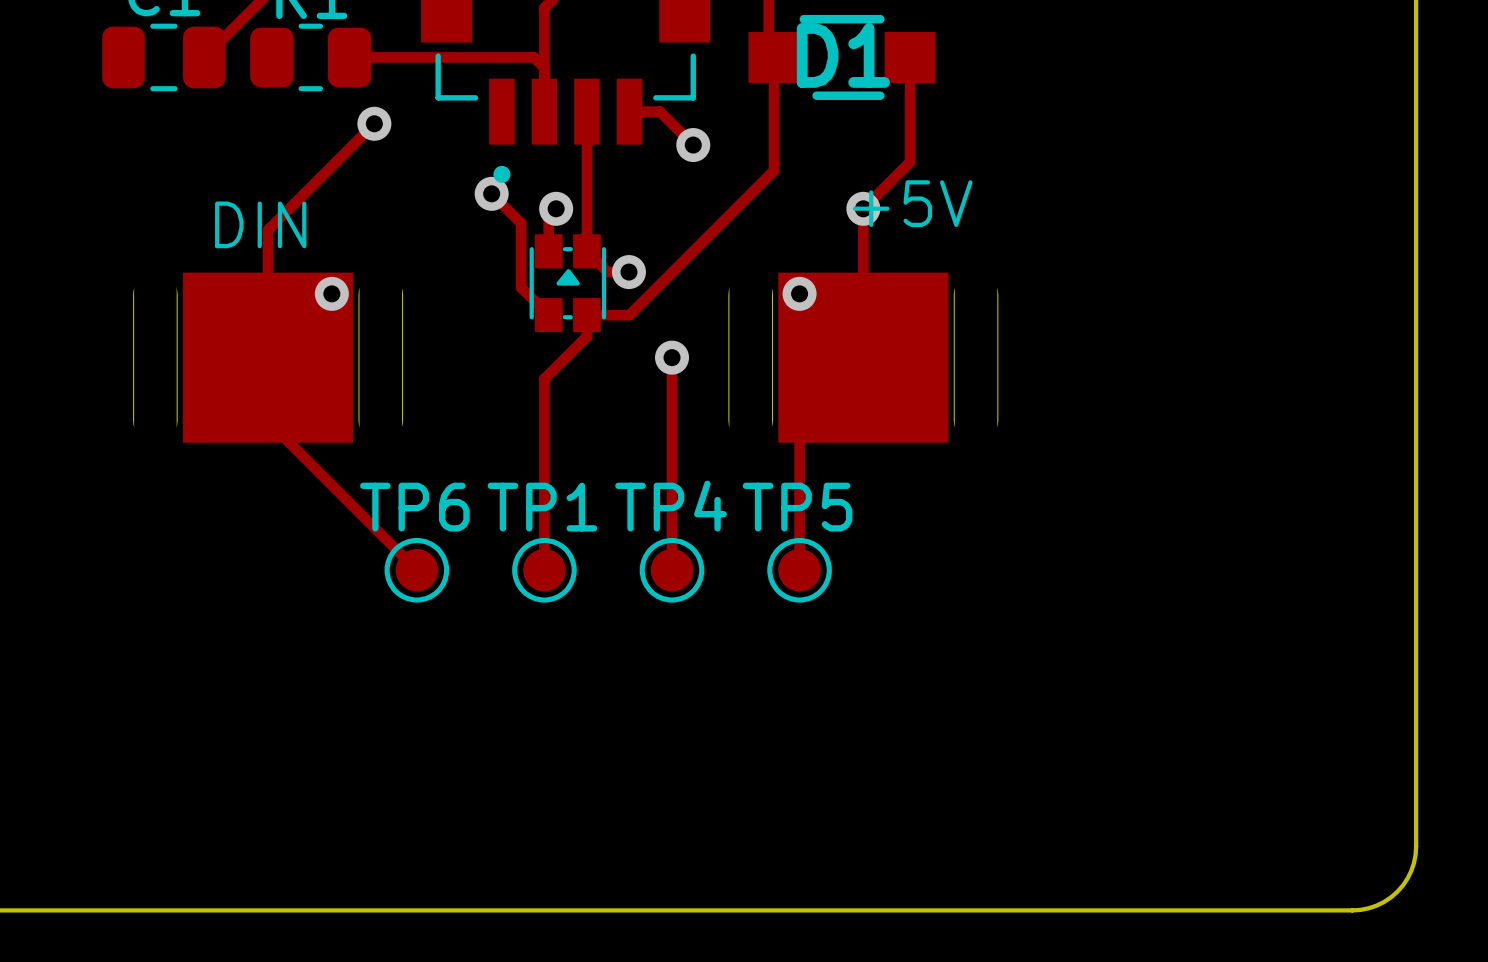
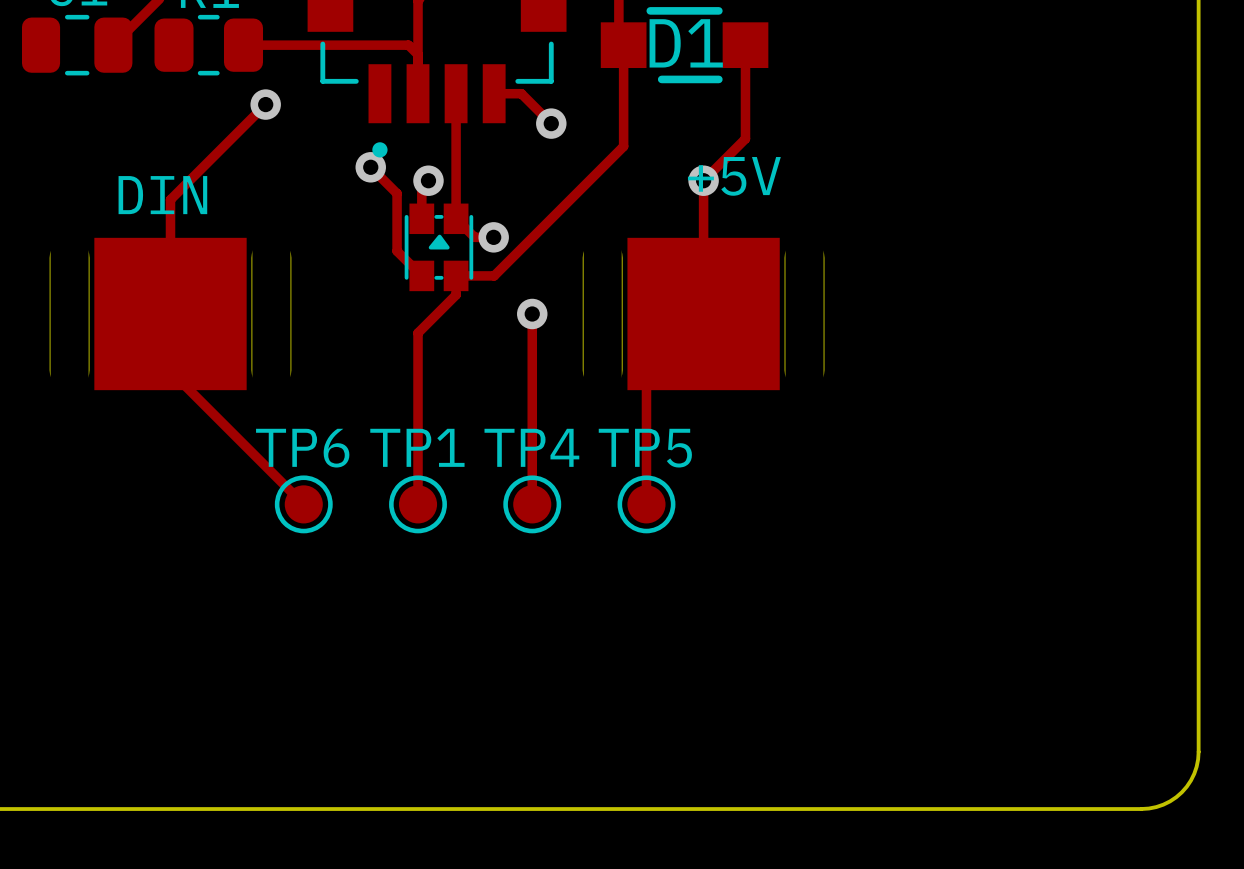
via: (331, 293) -> none
via: (799, 293) -> none

